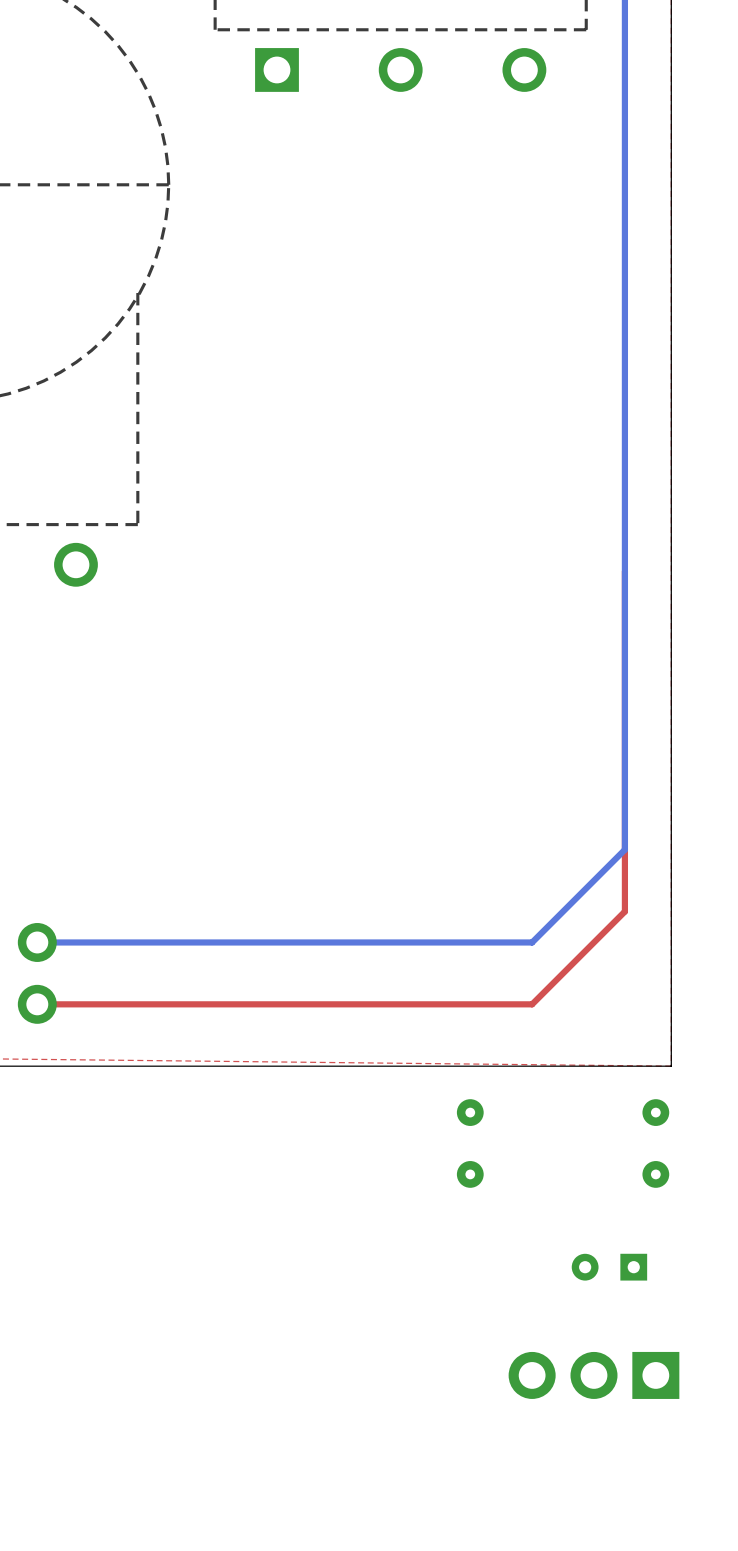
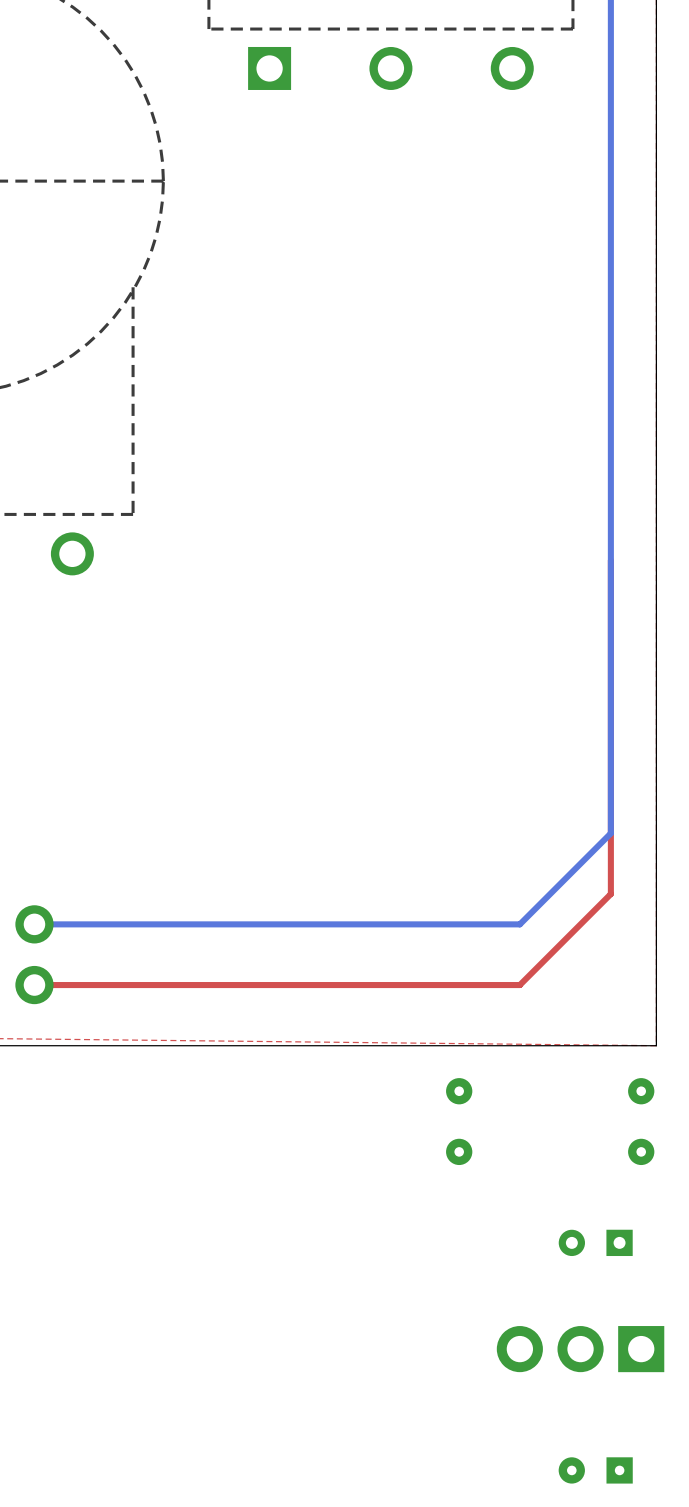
part: none -> (595, 1470)

